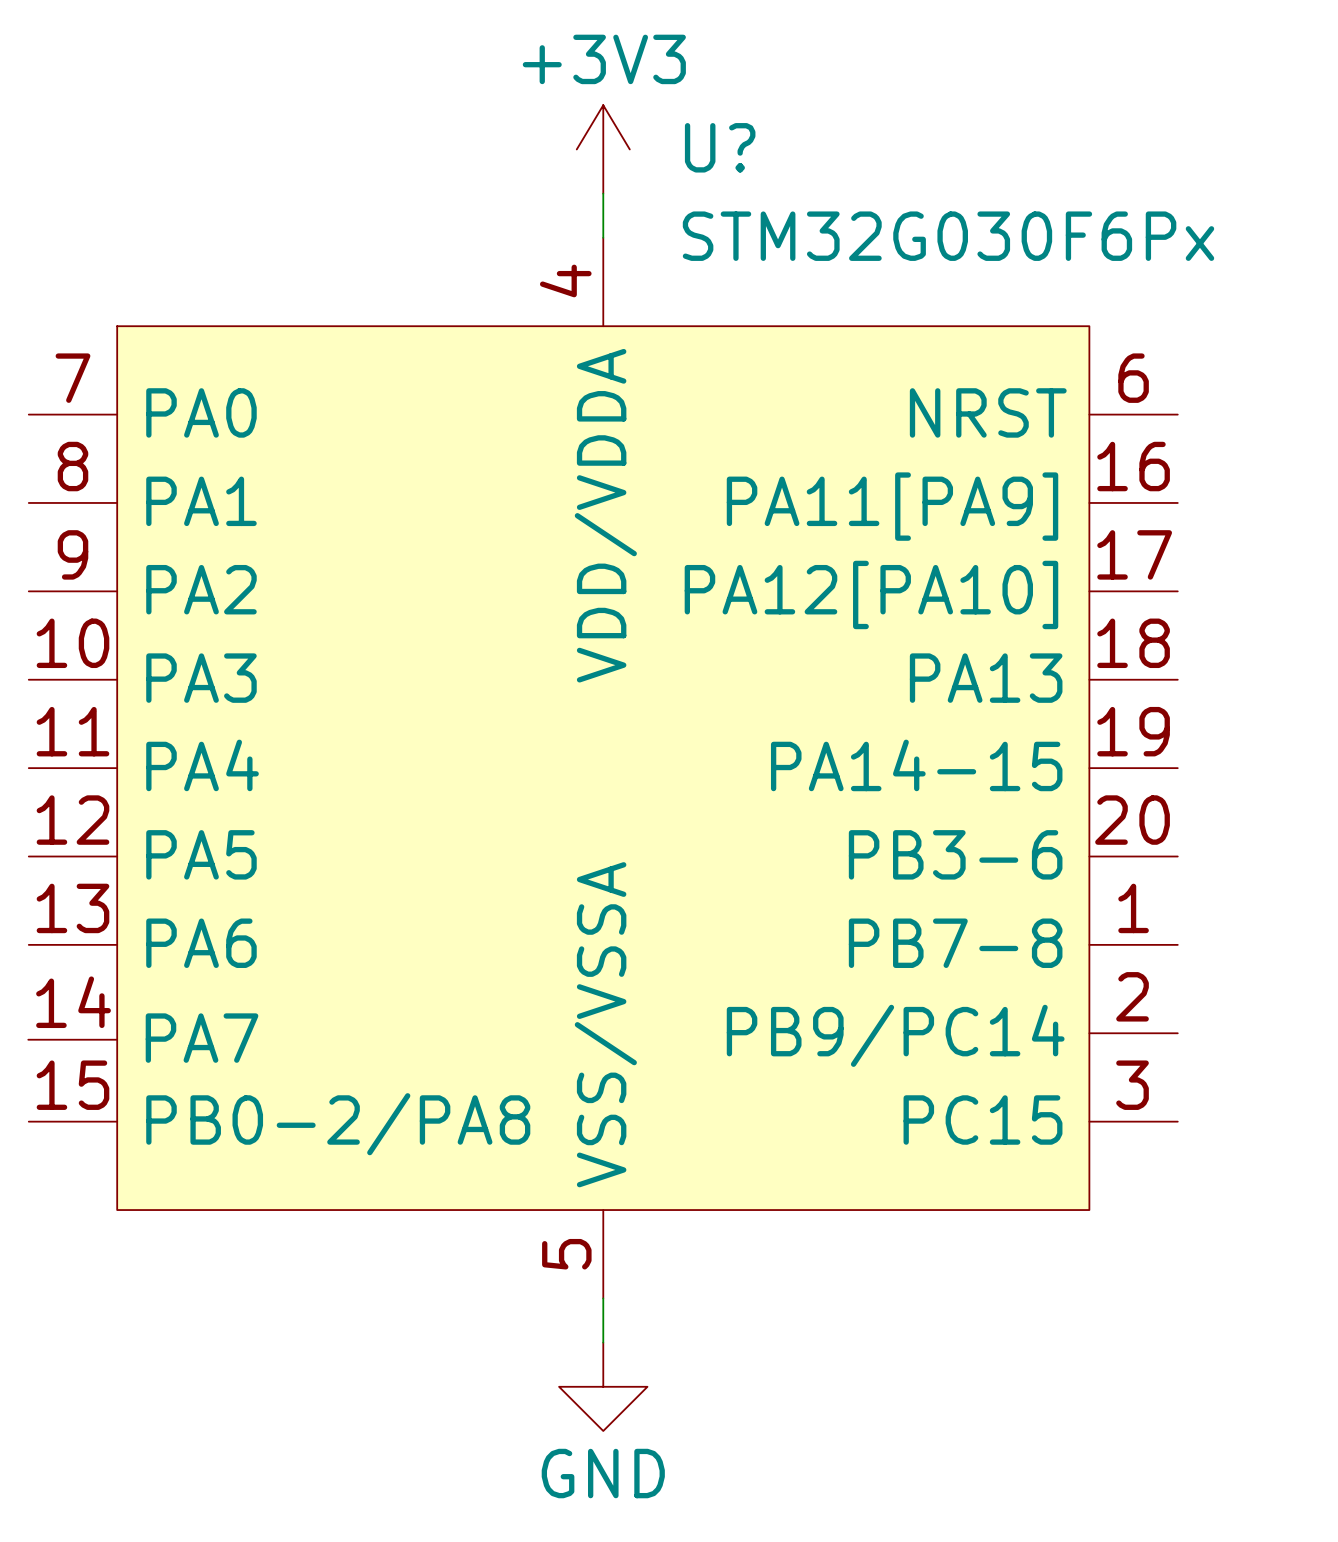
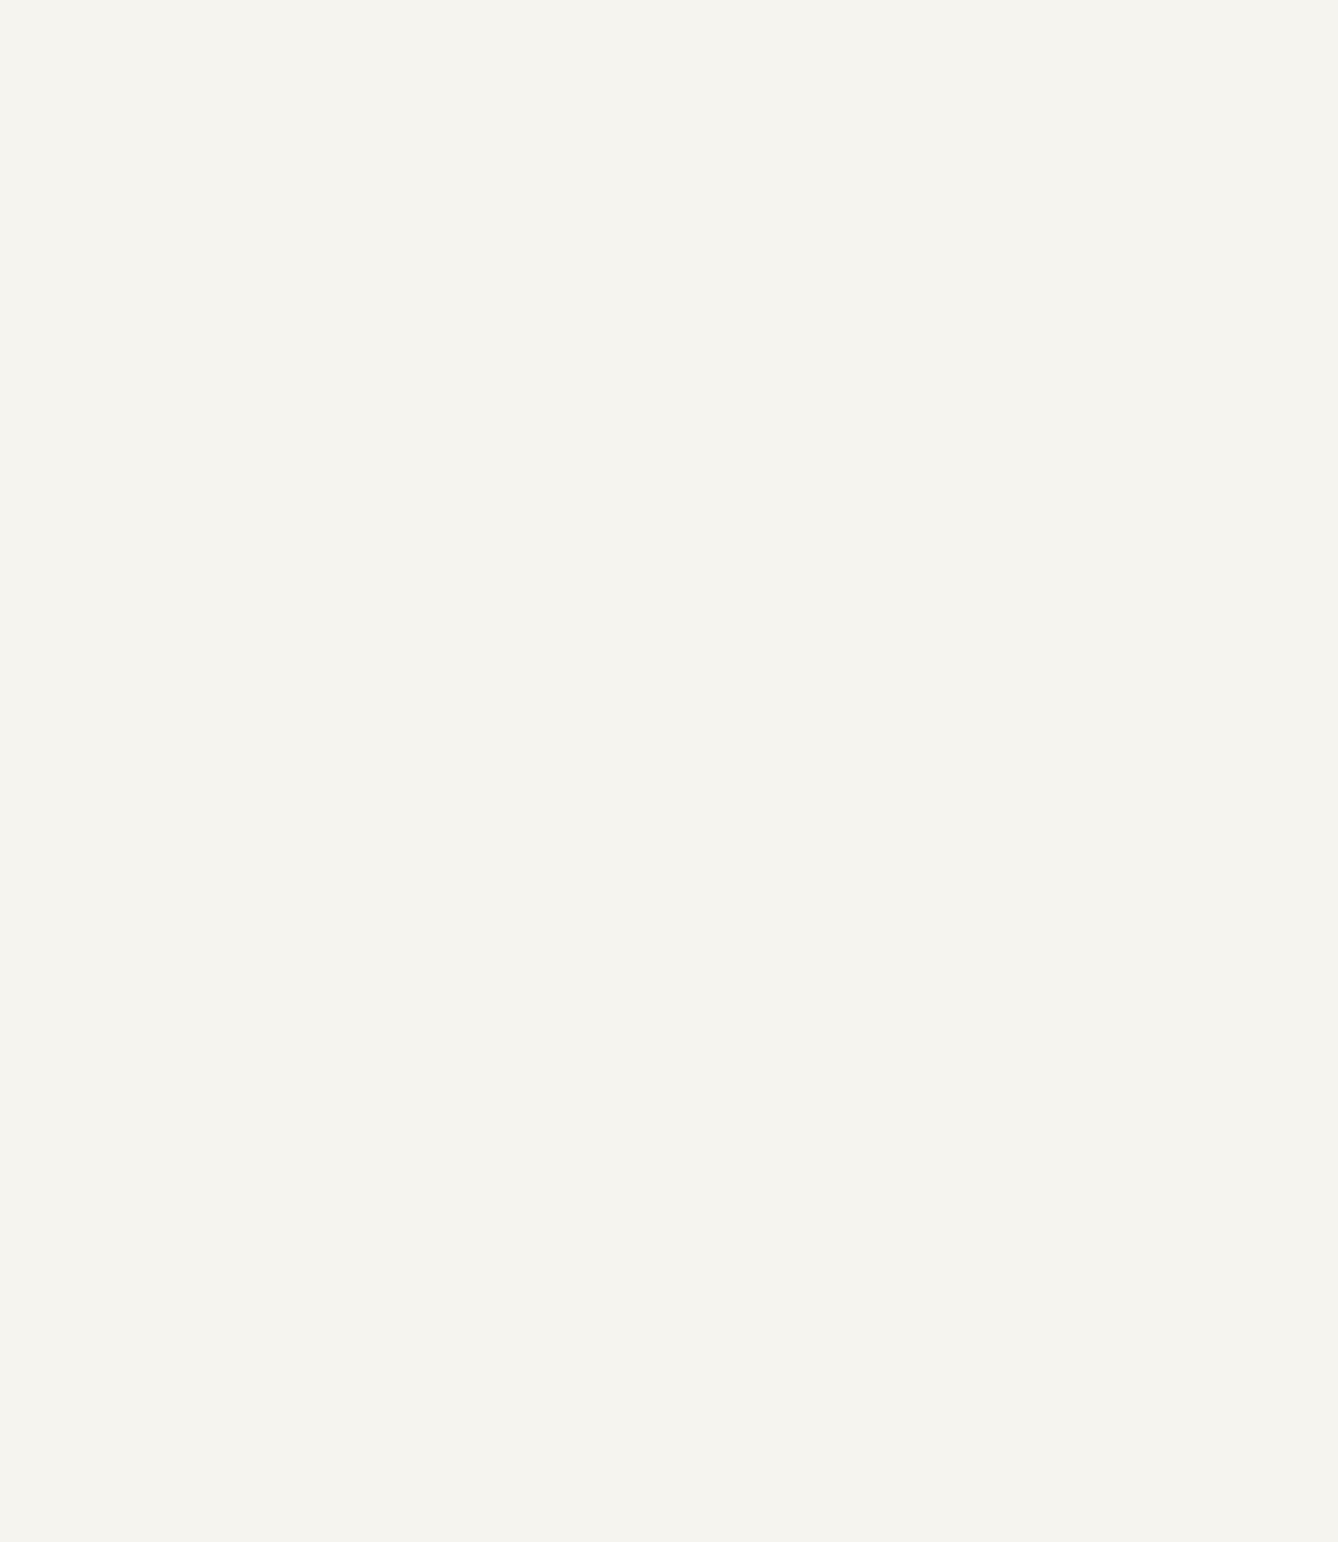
power symbol: +3V3 (603, 149) -> none
wire: (603, 193) (603, 237) -> none
U?: STM32G030F6Px (603, 768) -> none
wire: (603, 1298) (603, 1342) -> none
power symbol: GND (603, 1386) -> none

